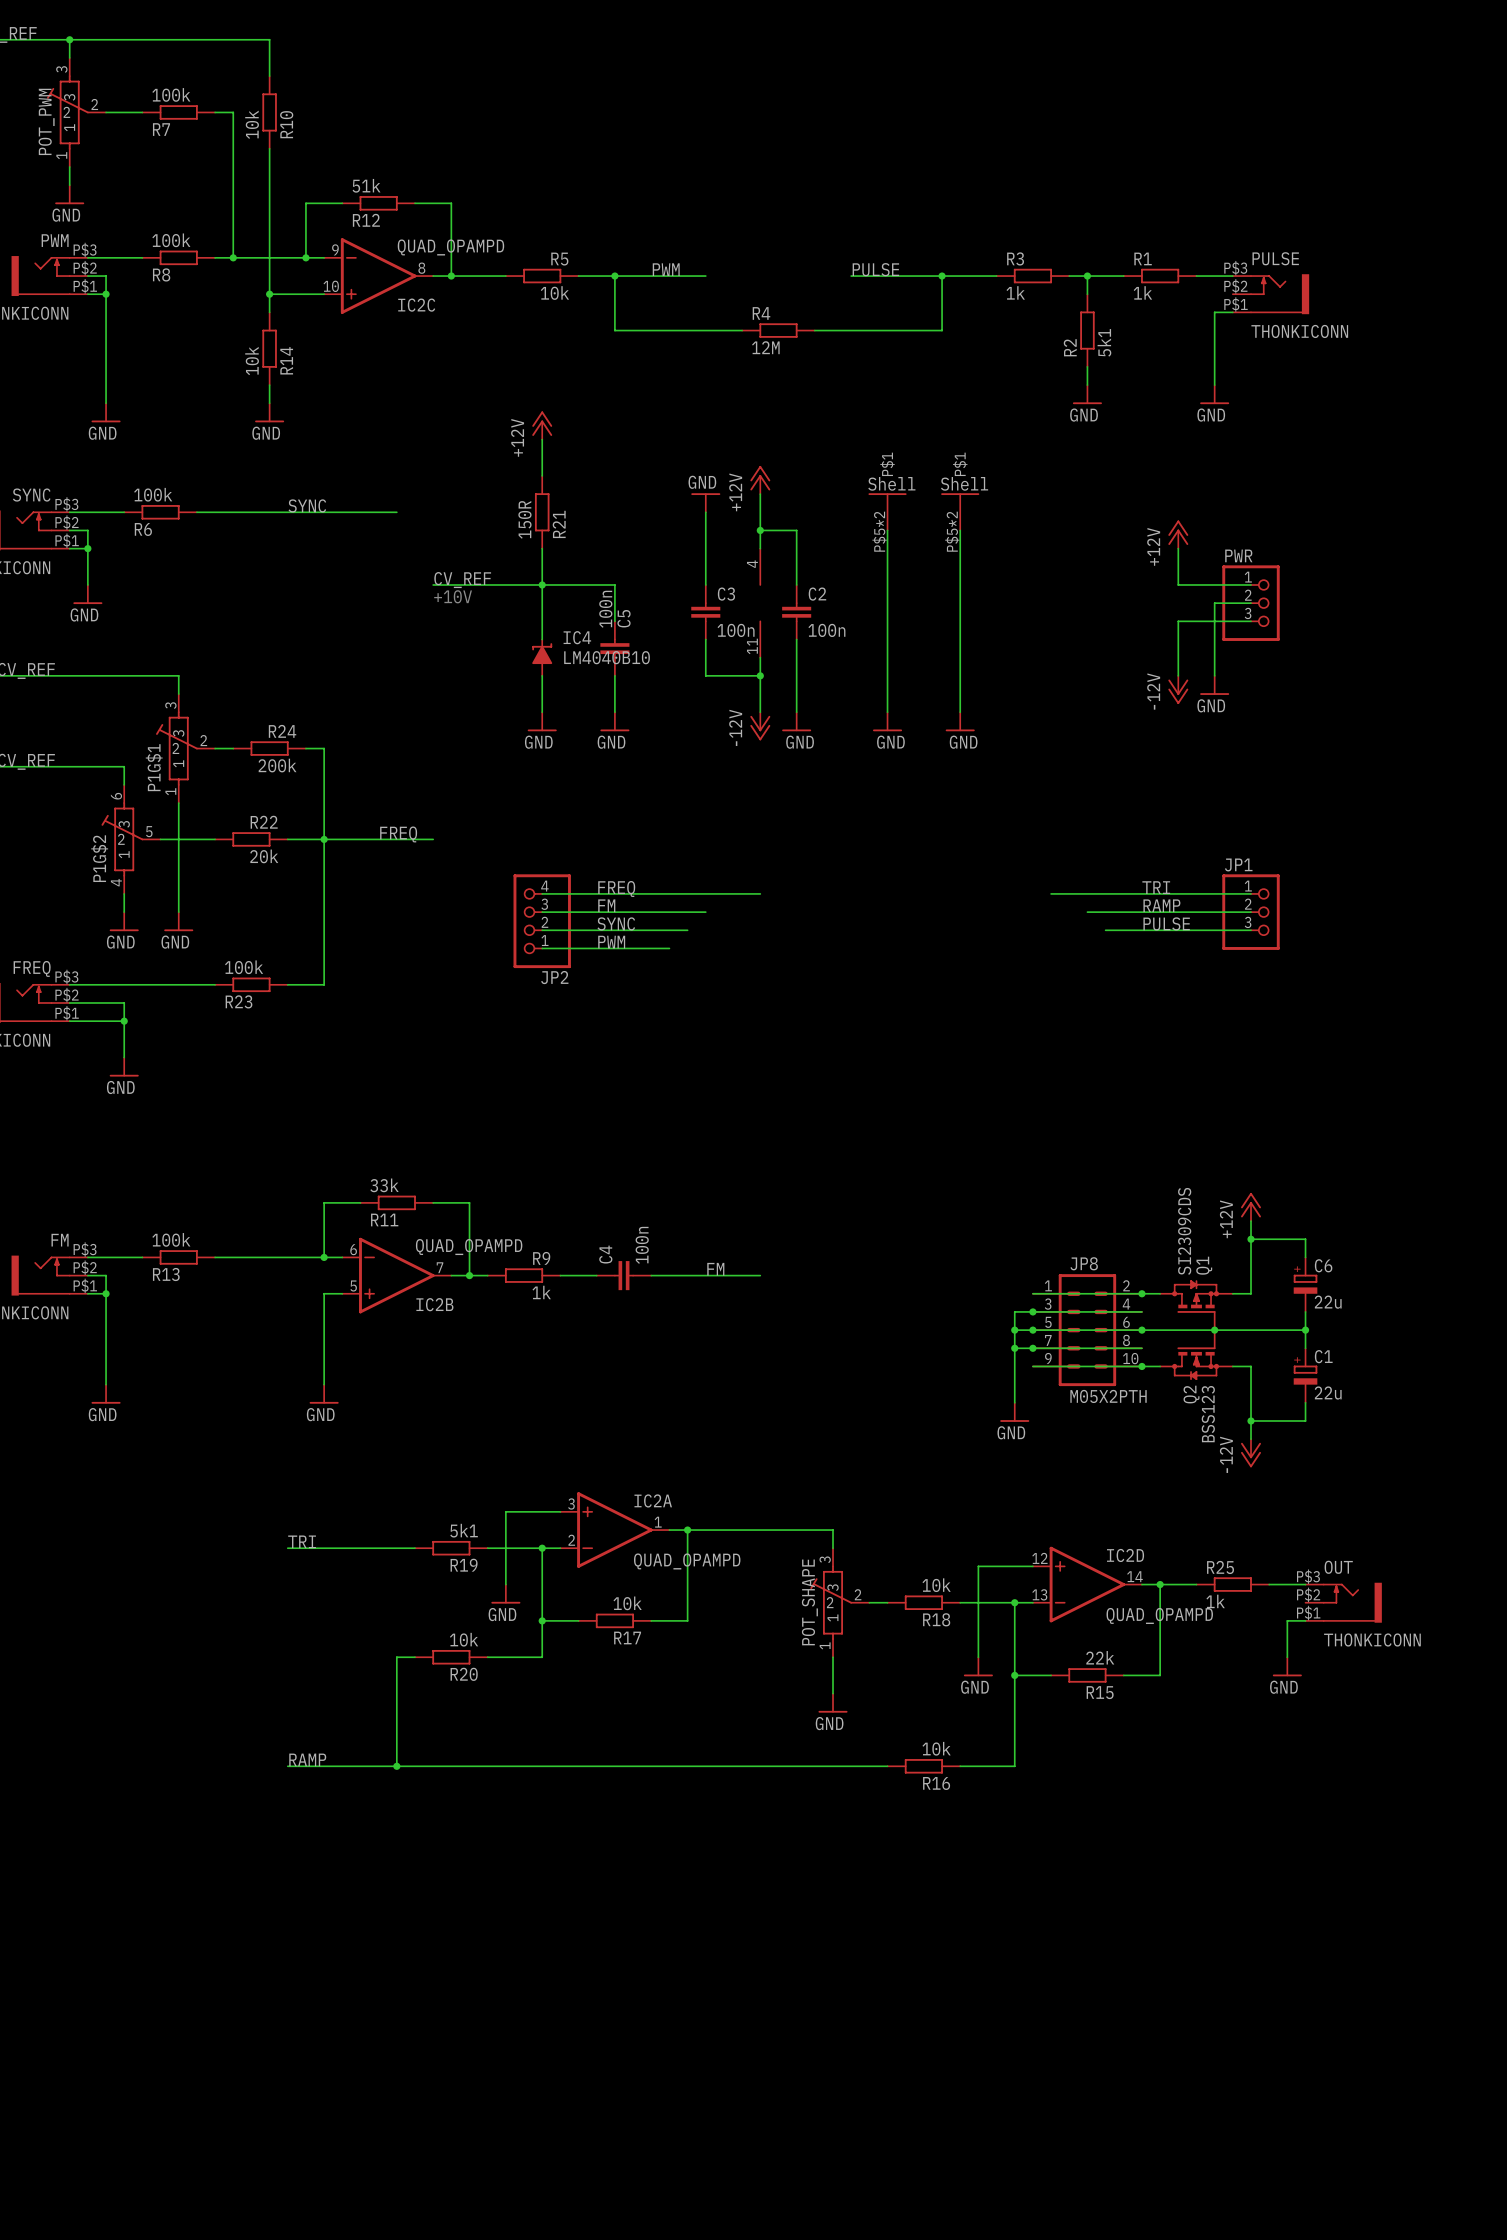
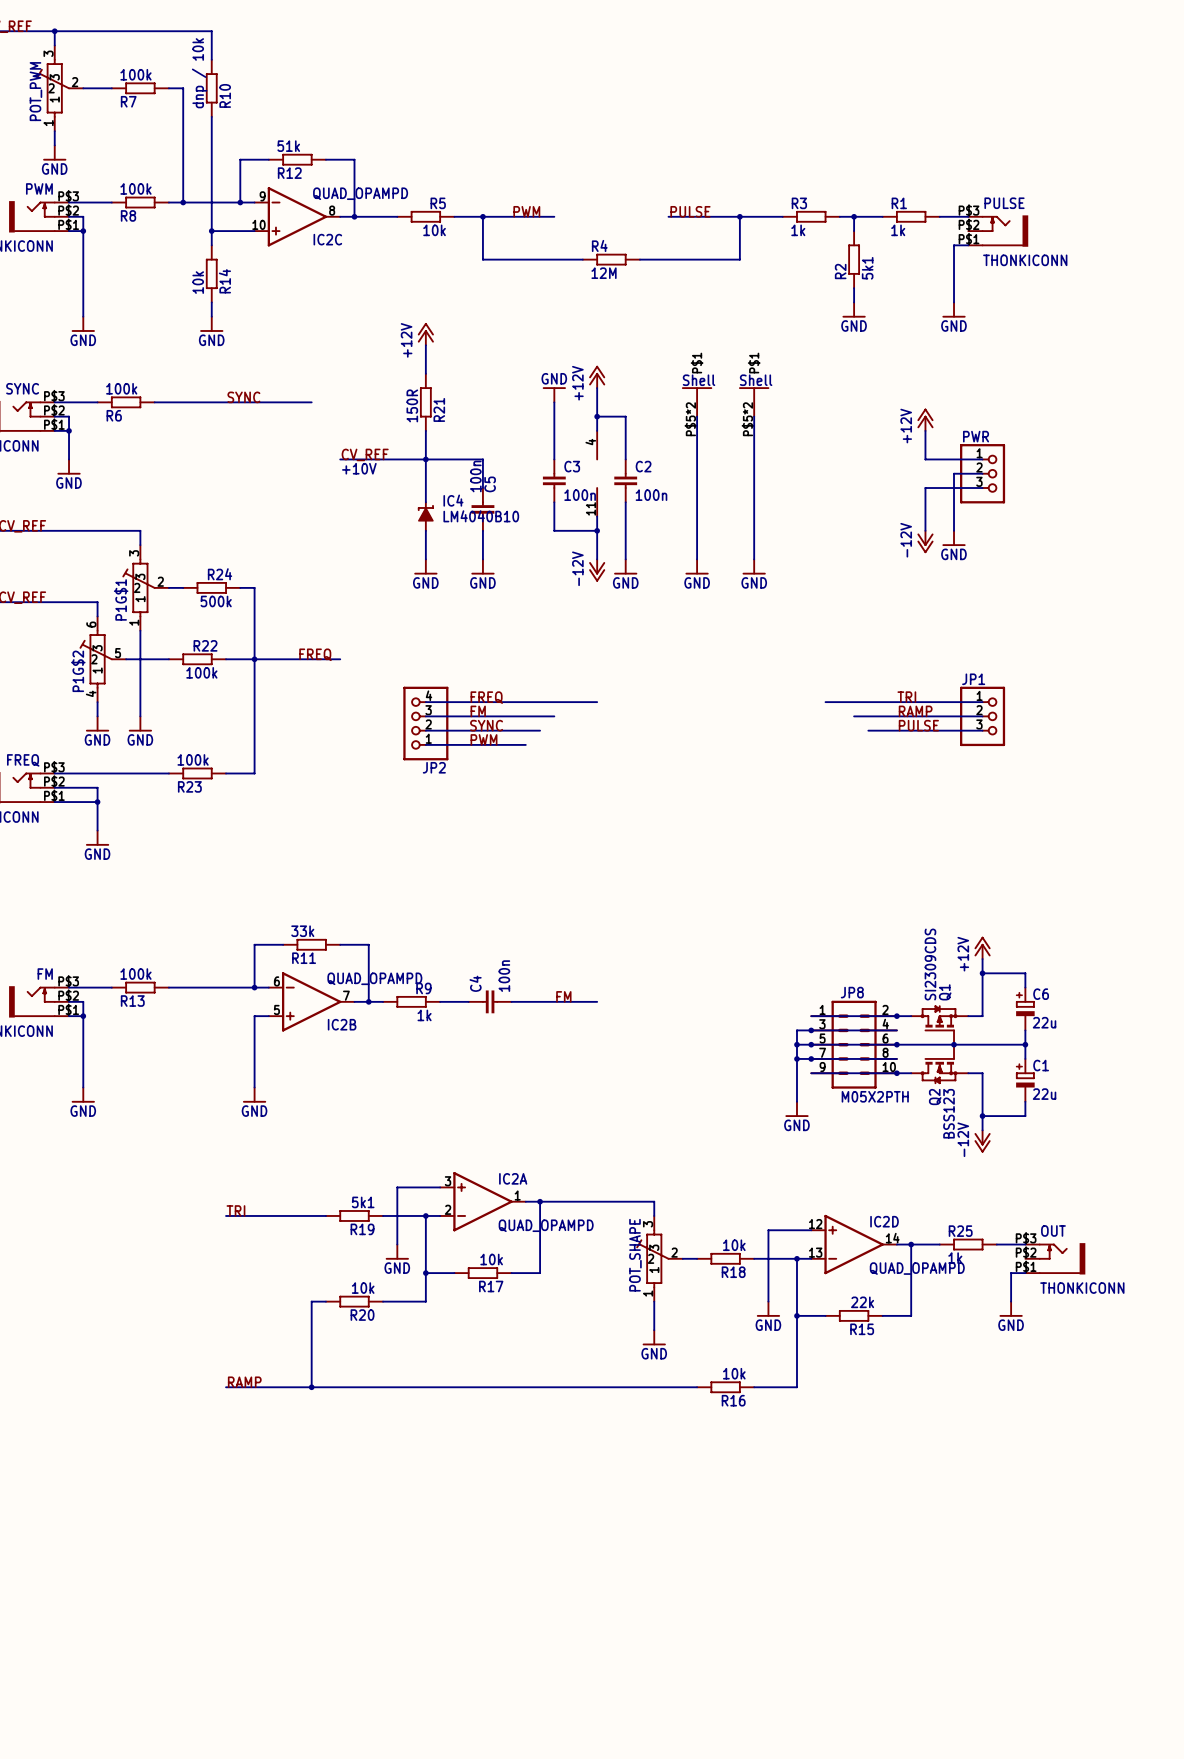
R10 value: 10k (252, 124) -> dnp / 10k (199, 73)
R24 value: 200k (277, 765) -> 500k (216, 601)
R22 value: 20k (264, 856) -> 100k (201, 672)

